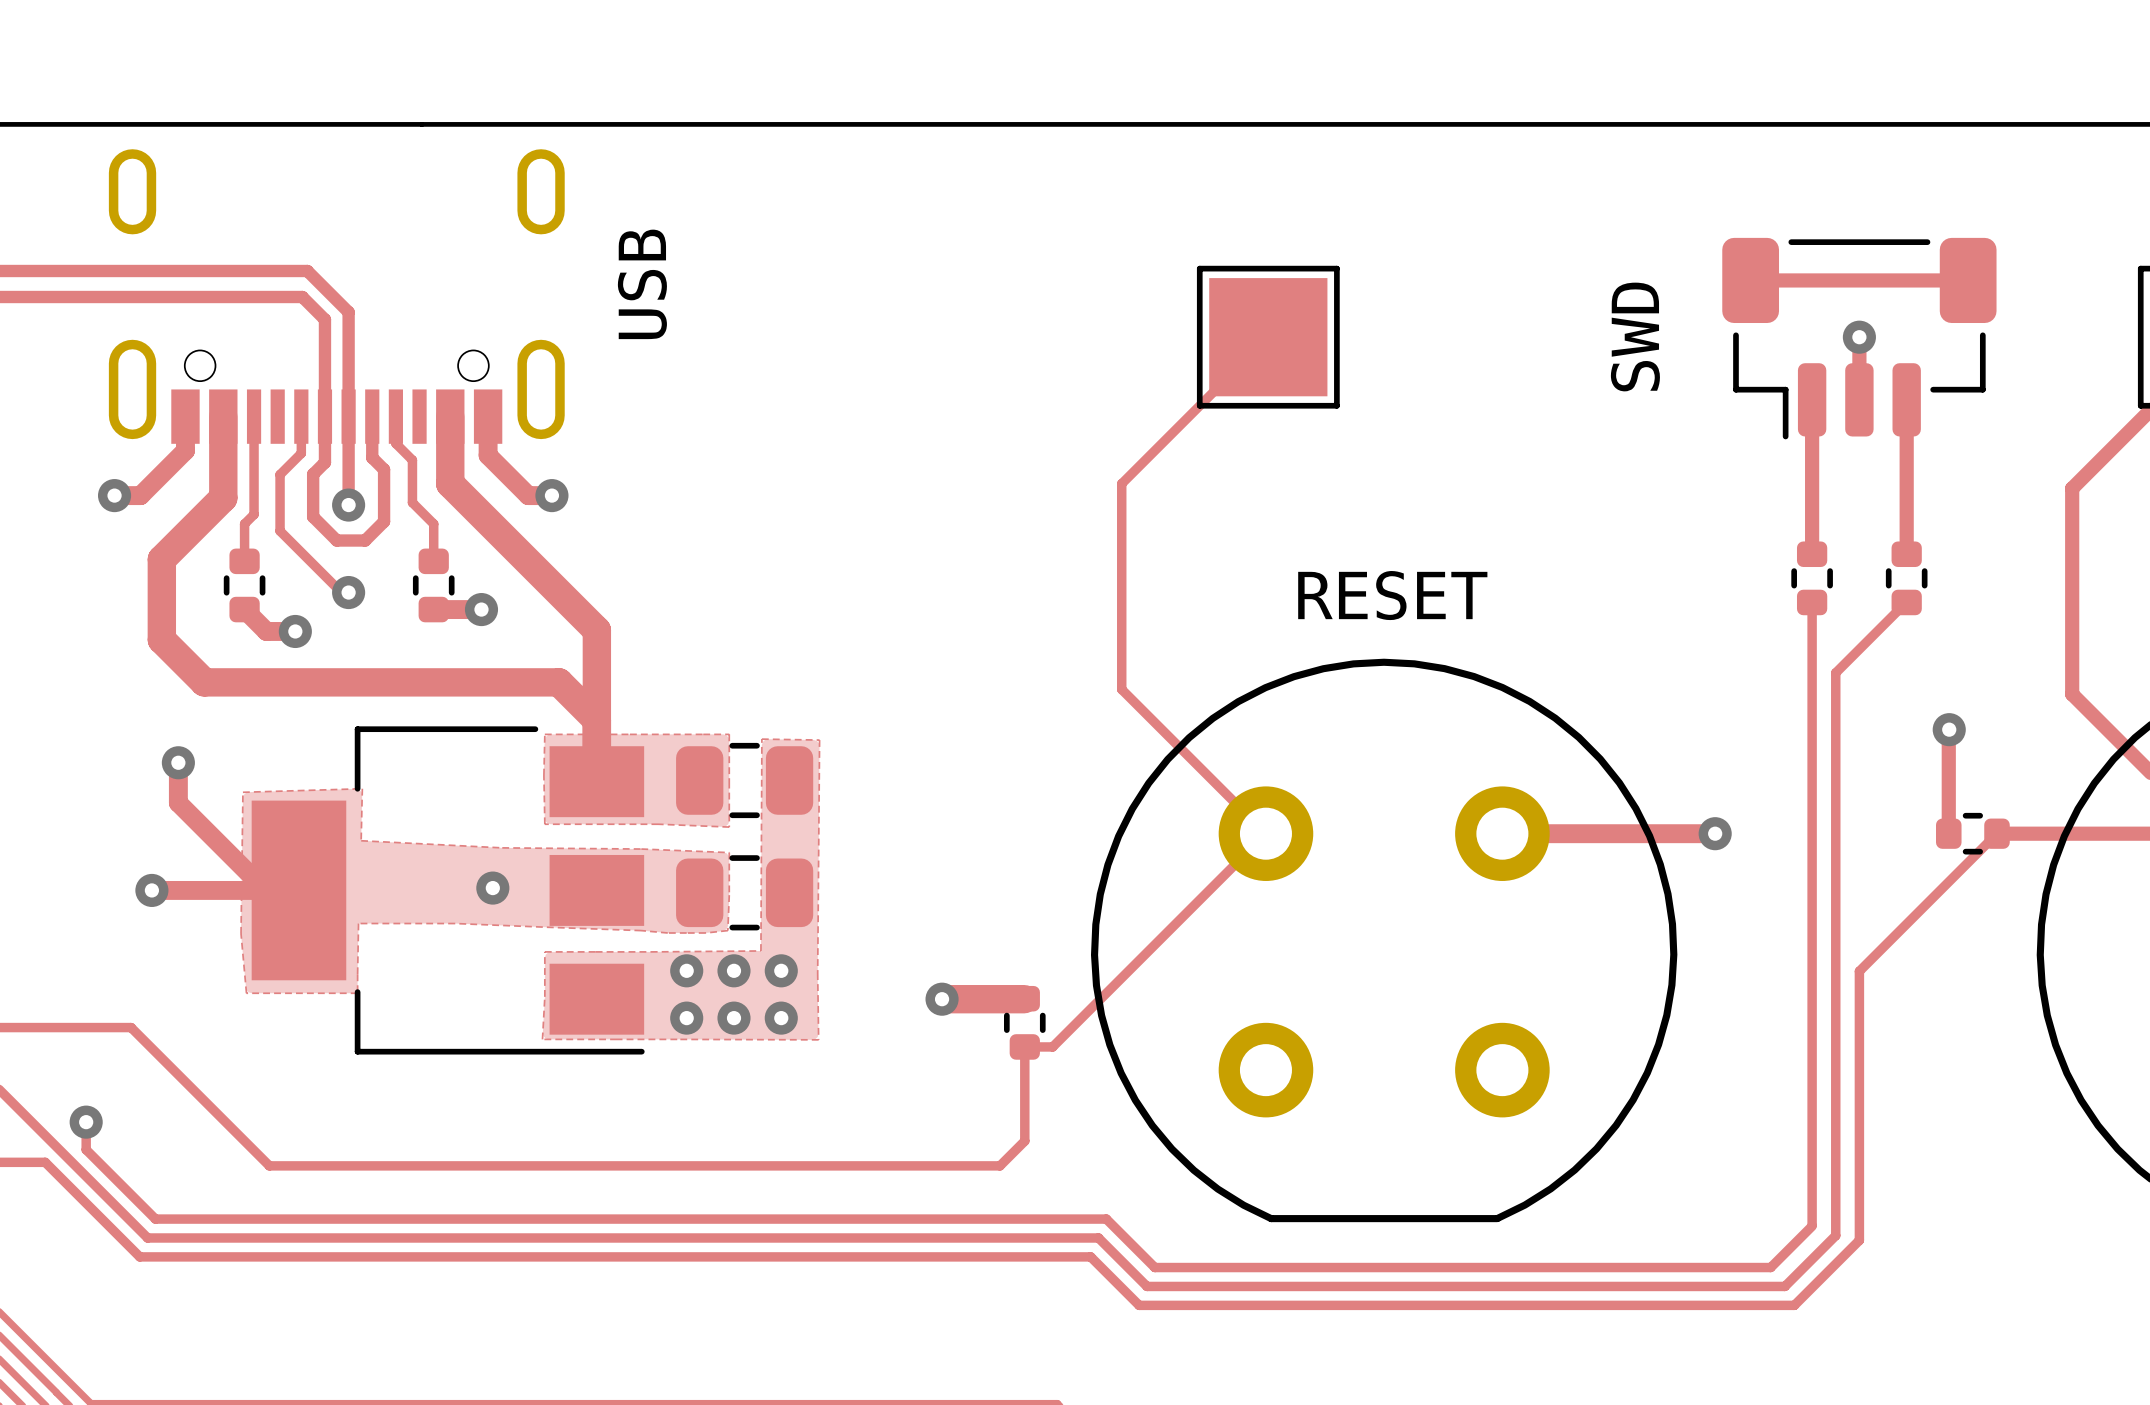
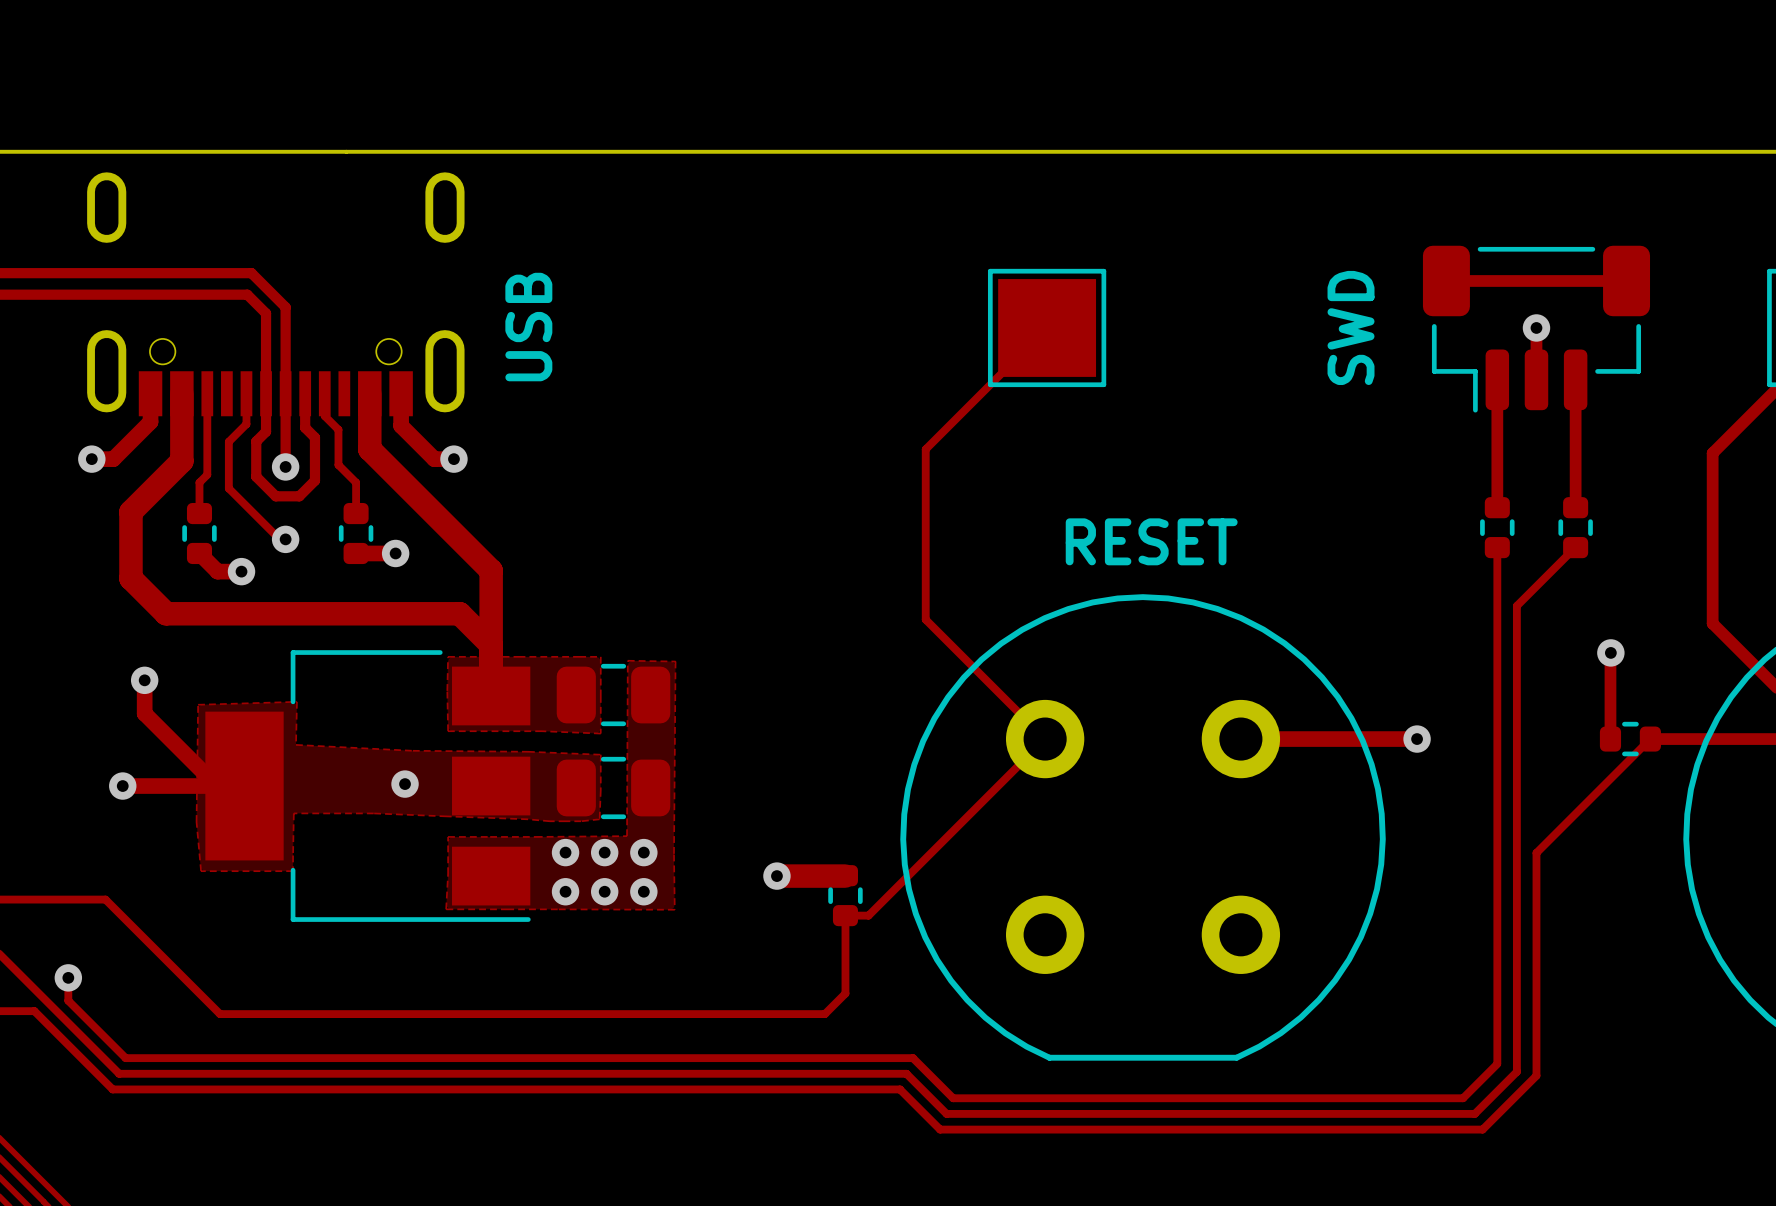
text position: USB (642, 284) -> USB (528, 327)

